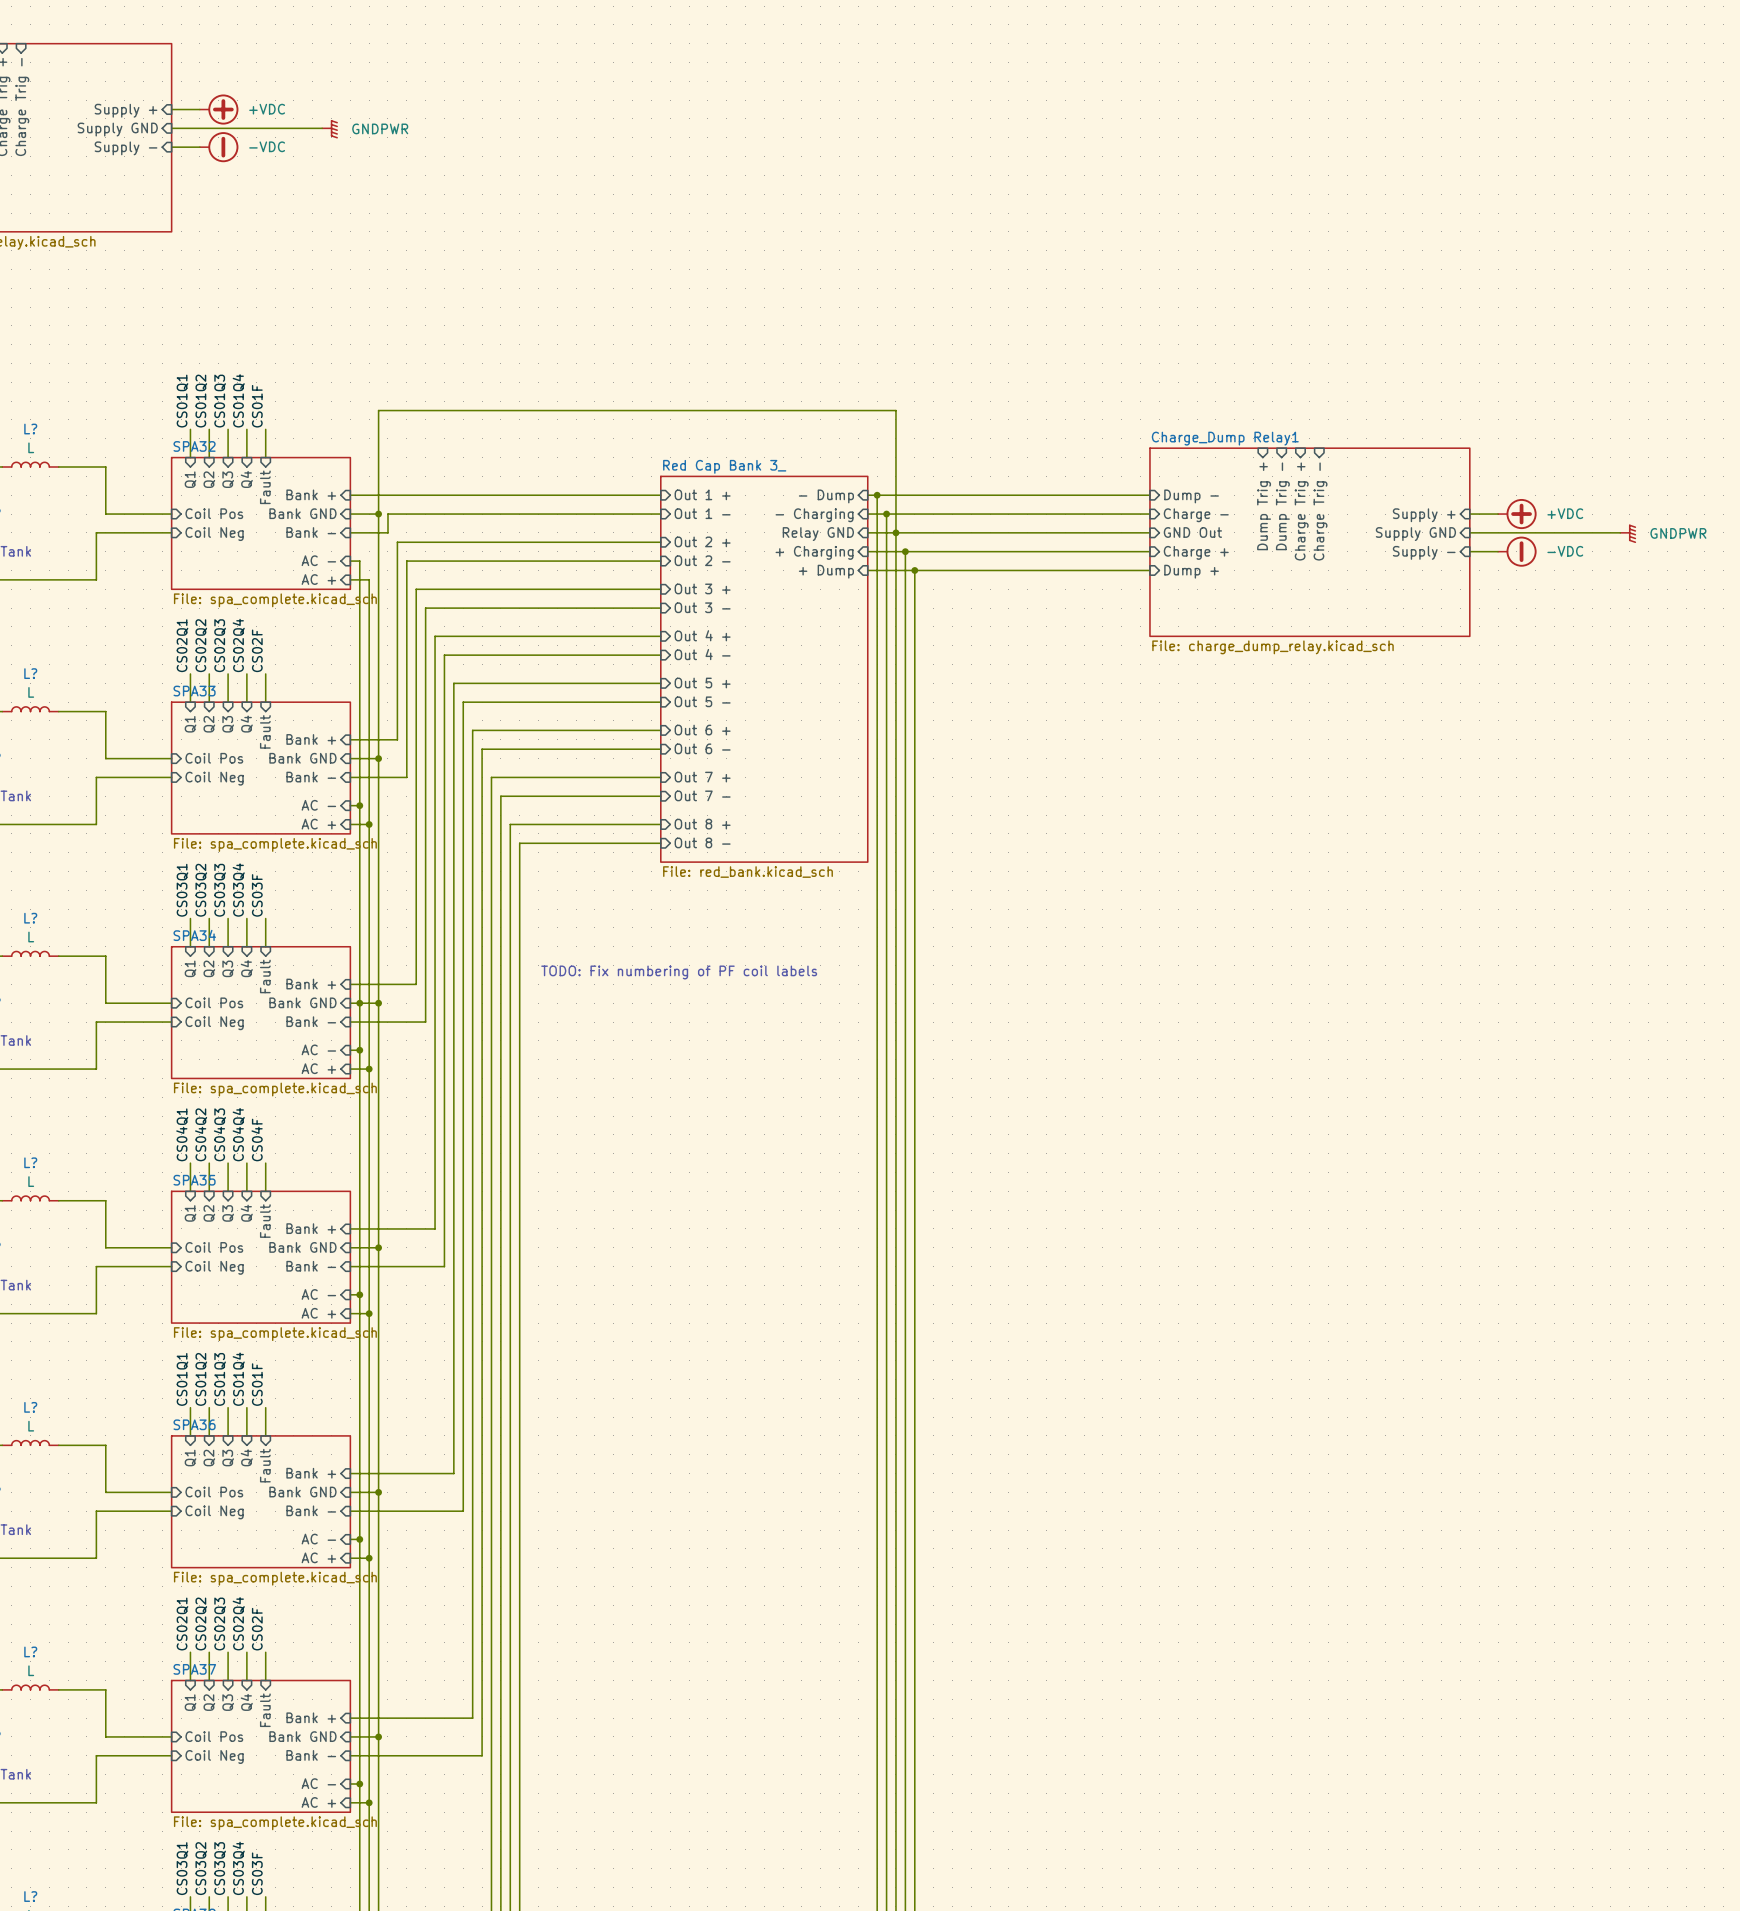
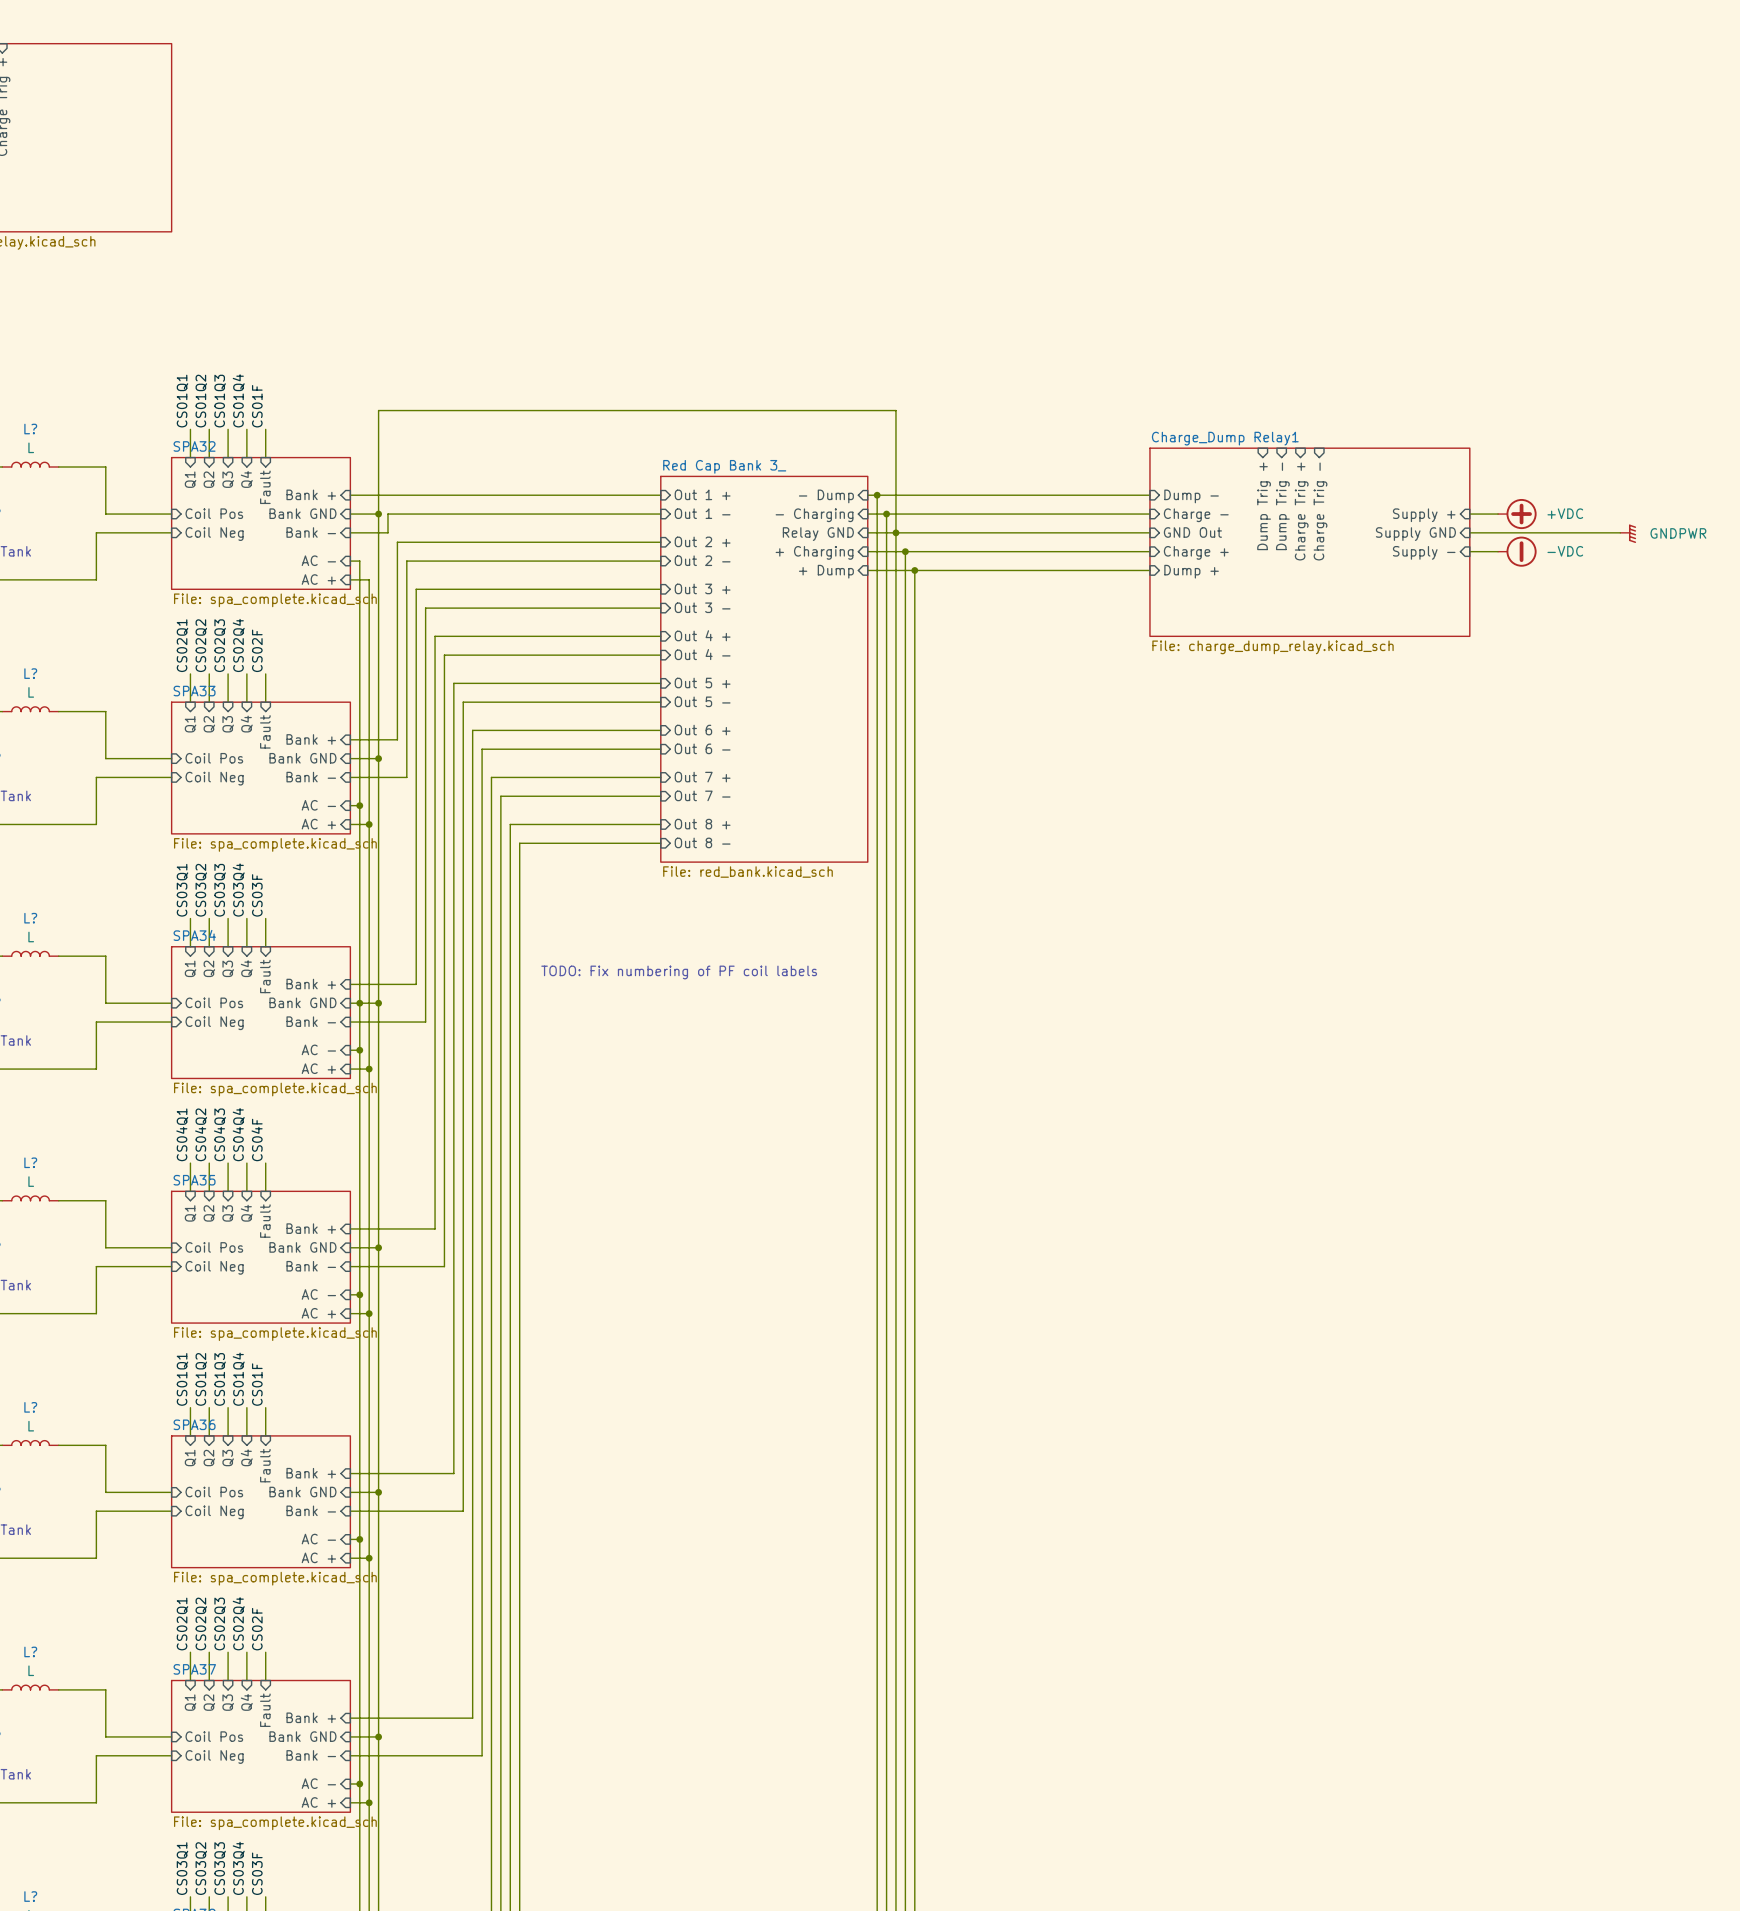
sheet pin: Charge Trig - (22, 106) -> none
wire: (171, 109) (199, 109) -> none
power symbol: +VDC (219, 109) -> none
sheet pin: Supply + (126, 110) -> none
wire: (171, 128) (322, 128) -> none
sheet pin: Supply GND (117, 129) -> none
power symbol: GNDPWR (330, 129) -> none
wire: (171, 147) (199, 147) -> none
power symbol: -VDC (219, 147) -> none
sheet pin: Supply - (126, 148) -> none

